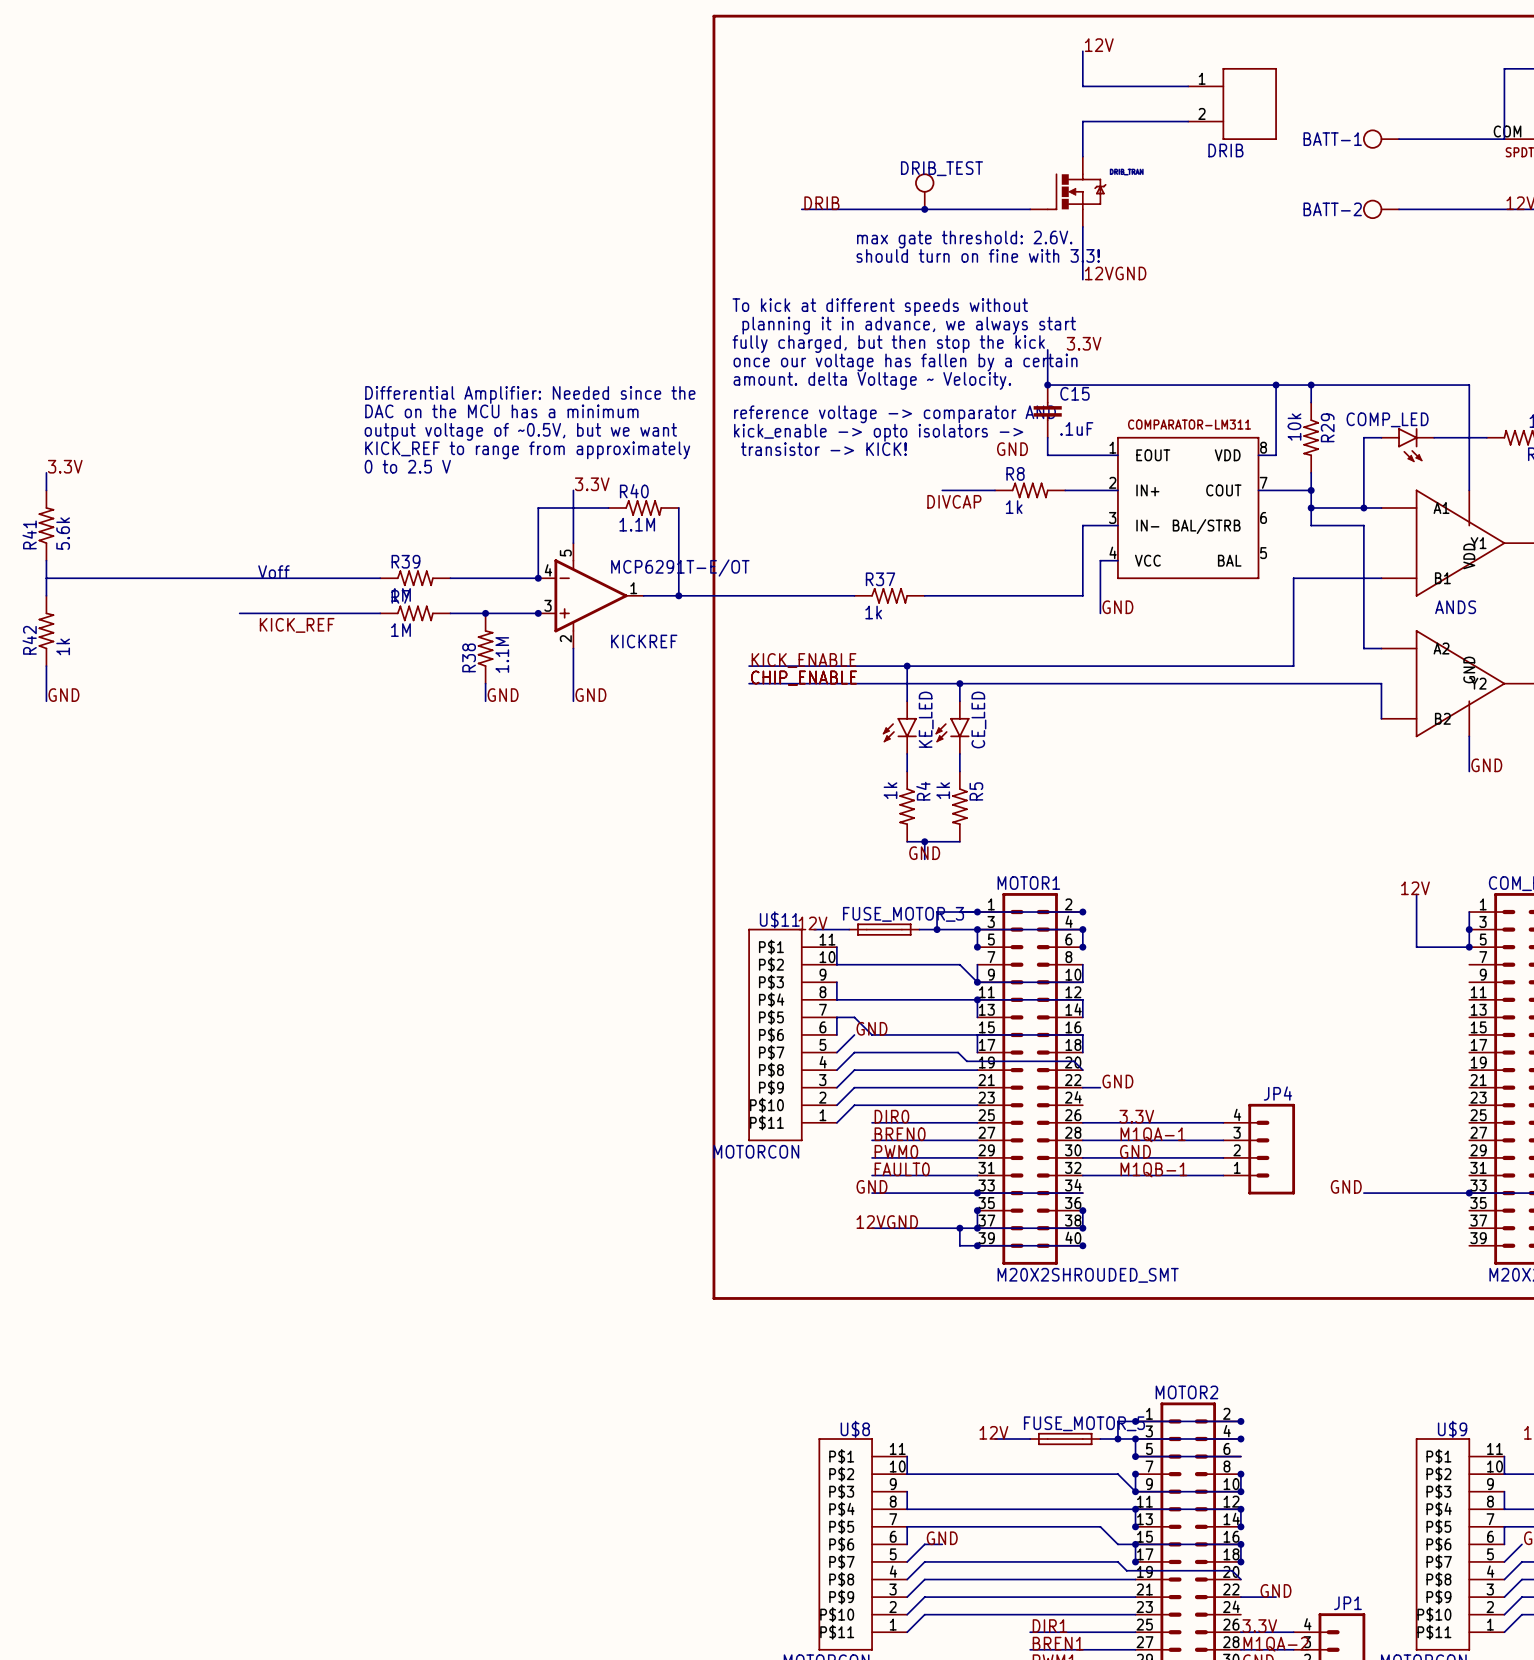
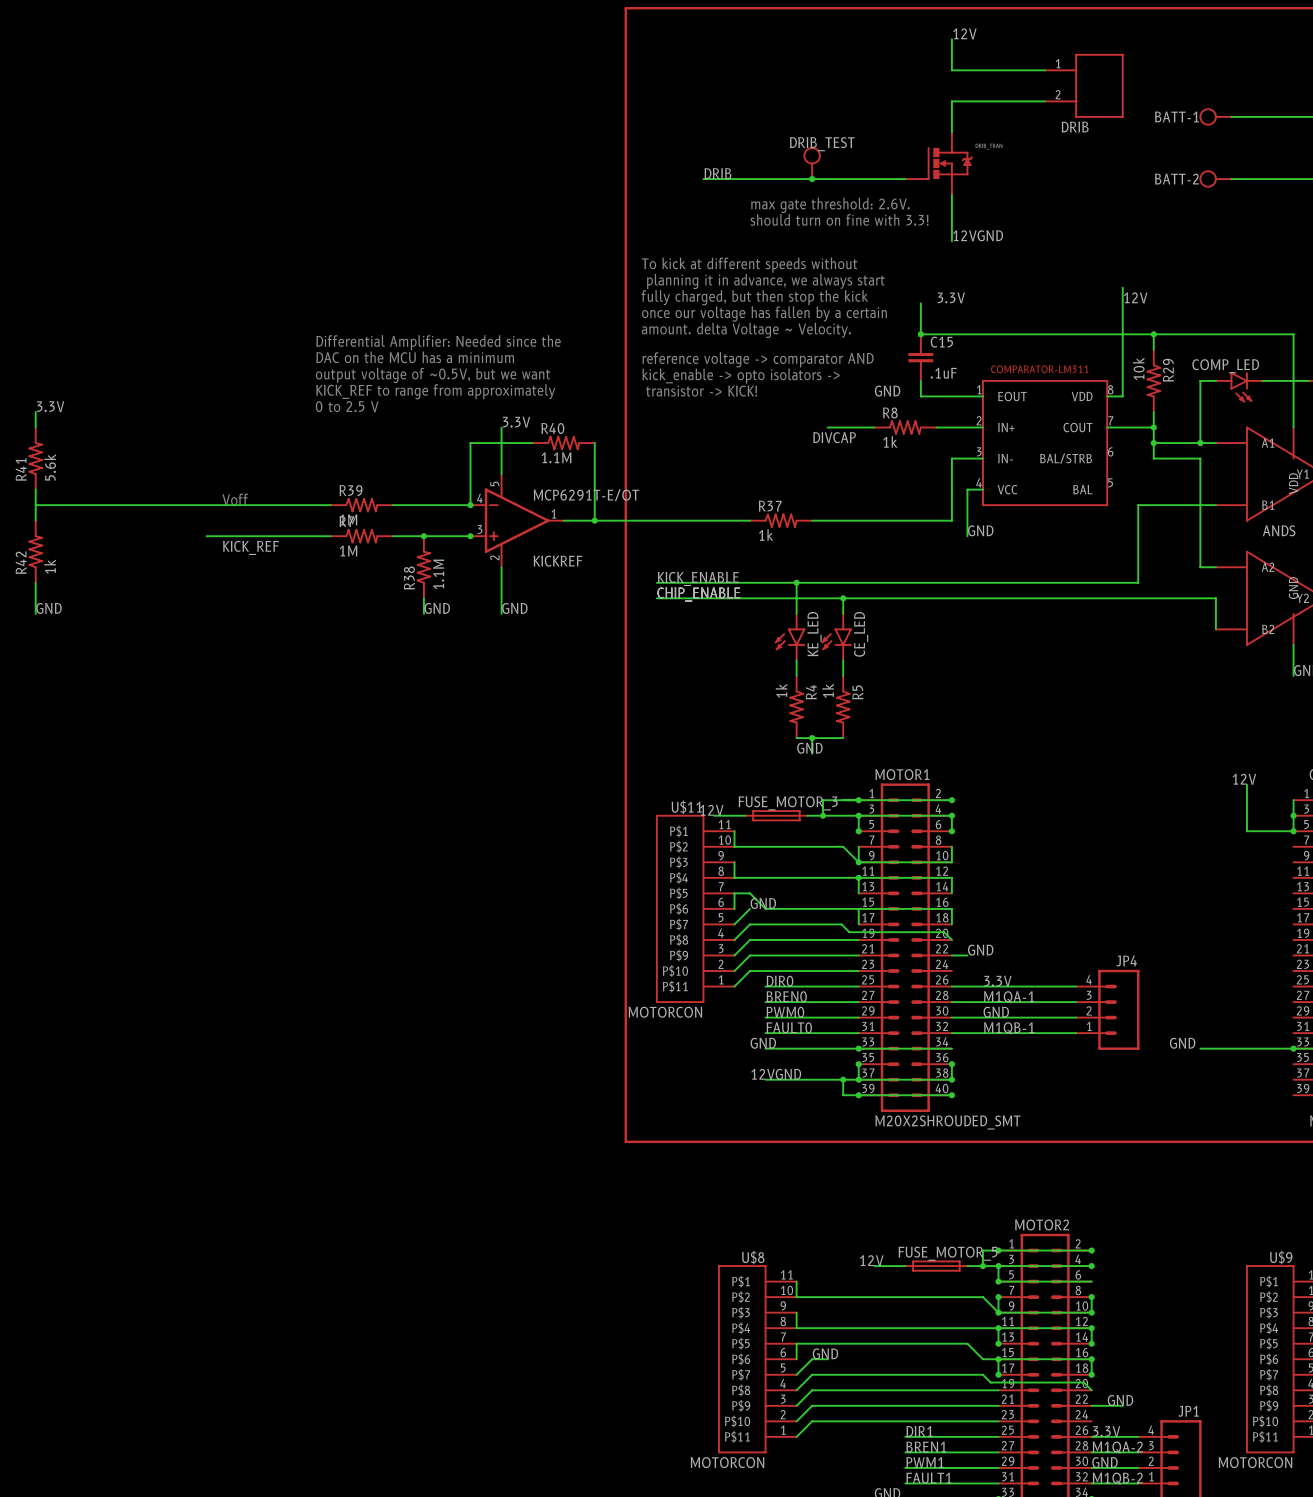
wire: none -> (1122, 287) (1122, 334)
label: none -> 12V (1135, 297)
junction: (1276, 385) -> none

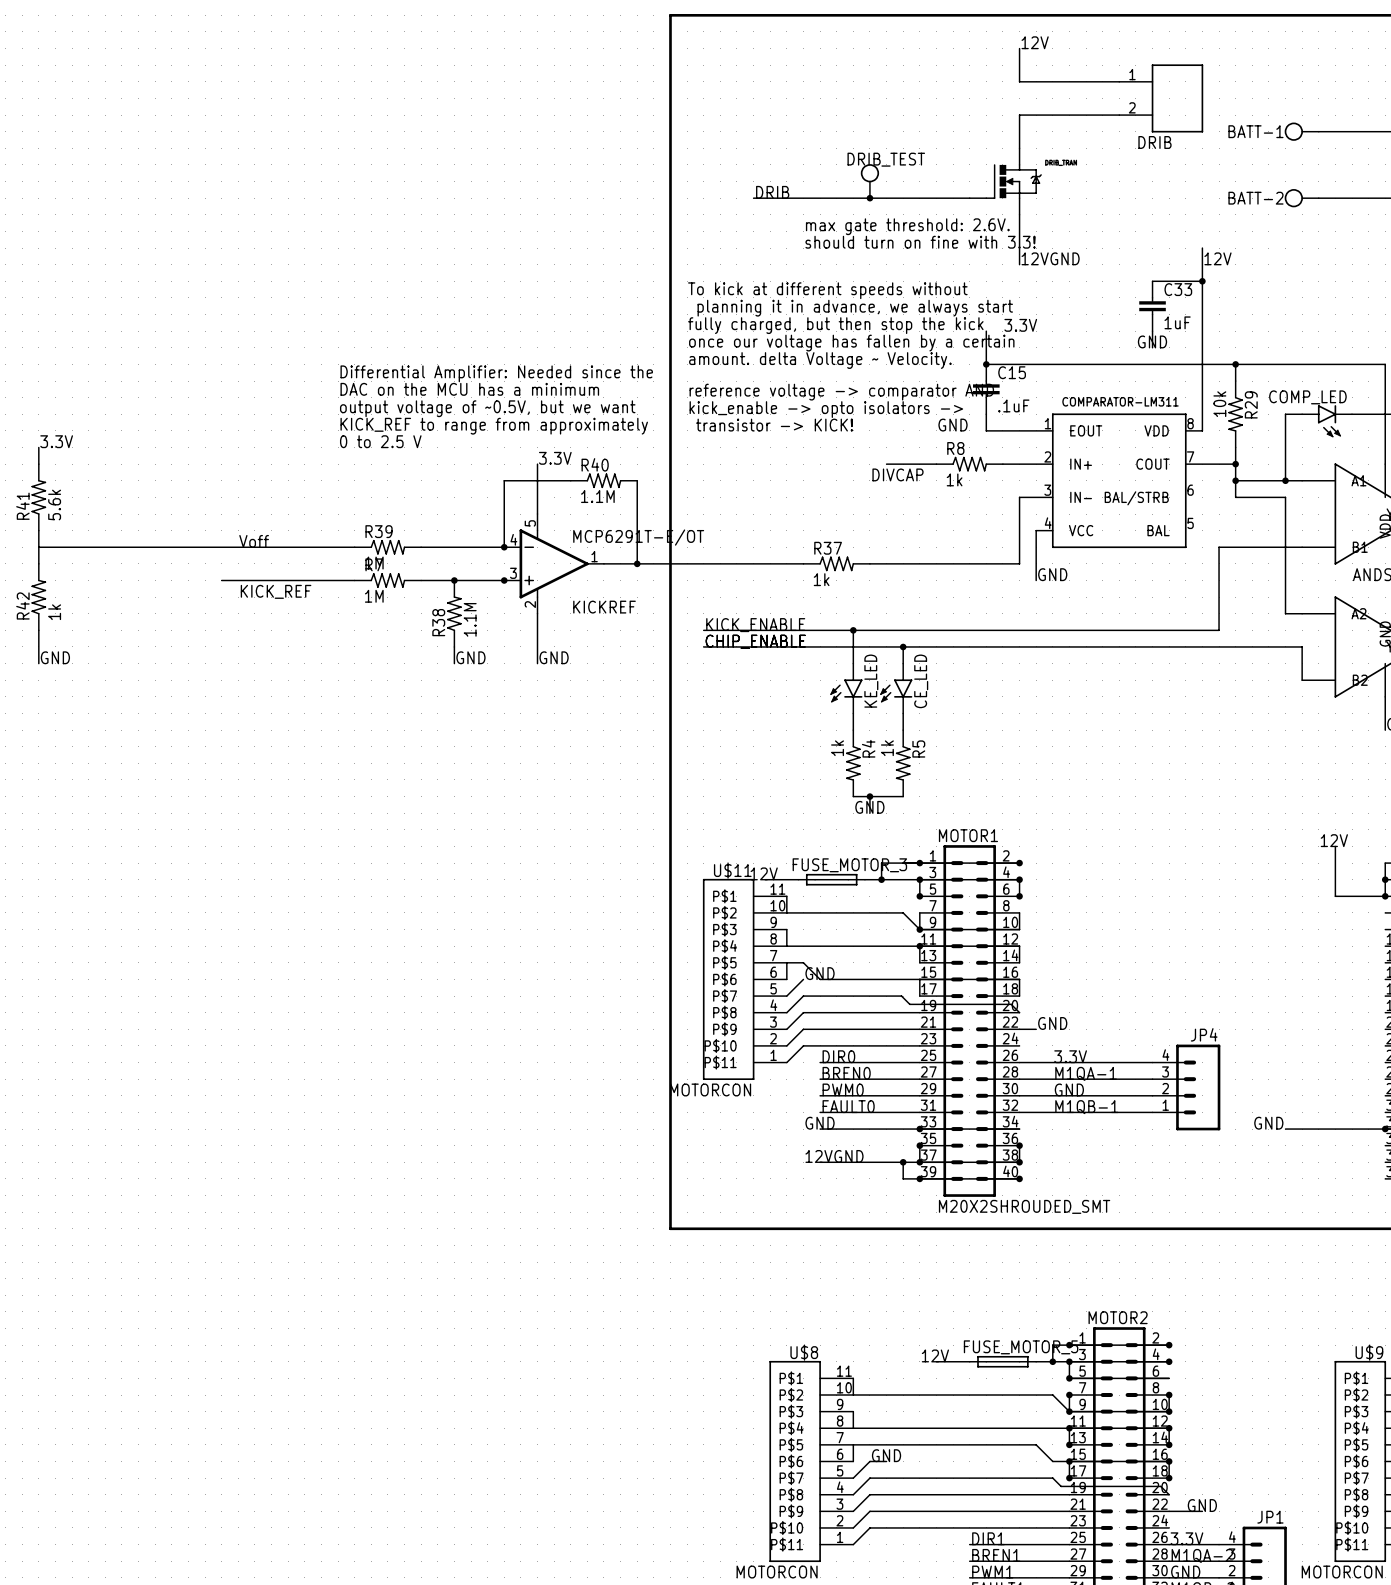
wire: none -> (1202, 248) (1202, 314)
wire: none -> (1152, 281) (1202, 281)
junction: none -> (1202, 281)
C33: none -> 1uF (1152, 306)
label position: 12V (1135, 297) -> 12V (1217, 258)
wire: none -> (1152, 331) (1152, 347)
label: none -> GND (1152, 341)

